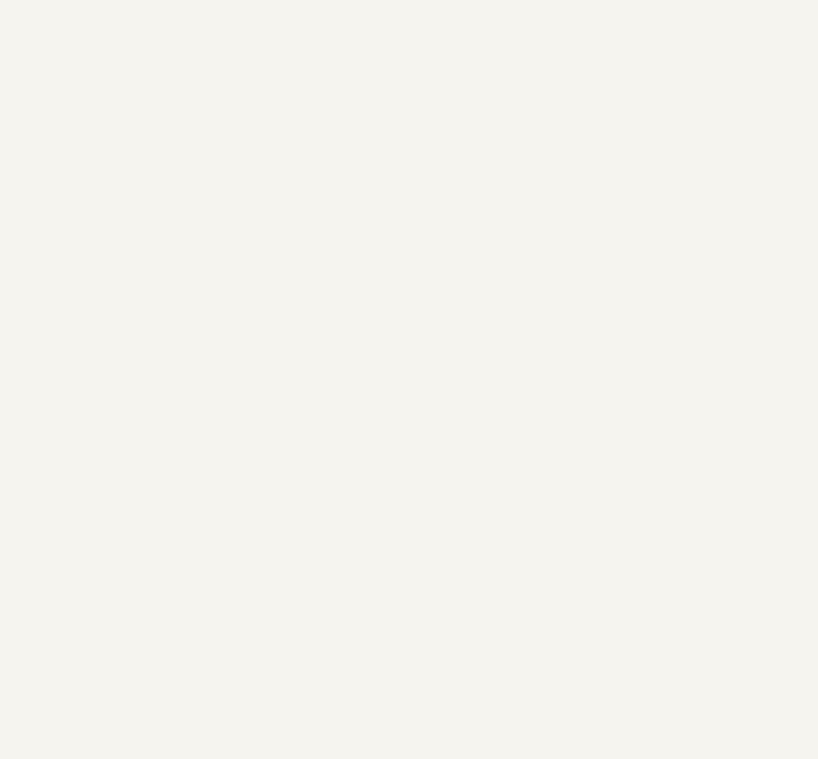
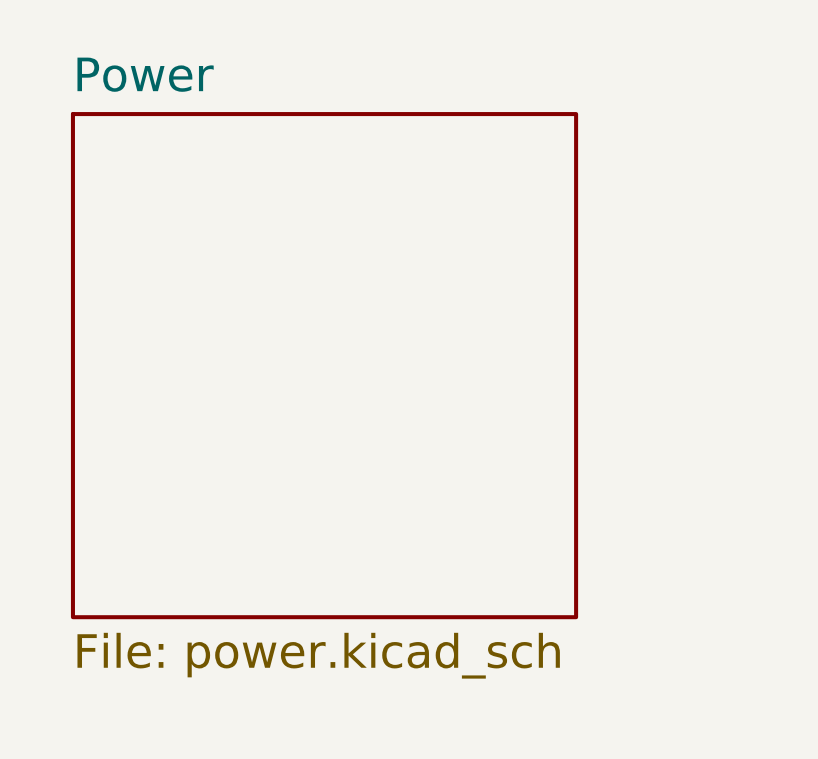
sheet Power: none -> File: power.kicad_sch (324, 365)

